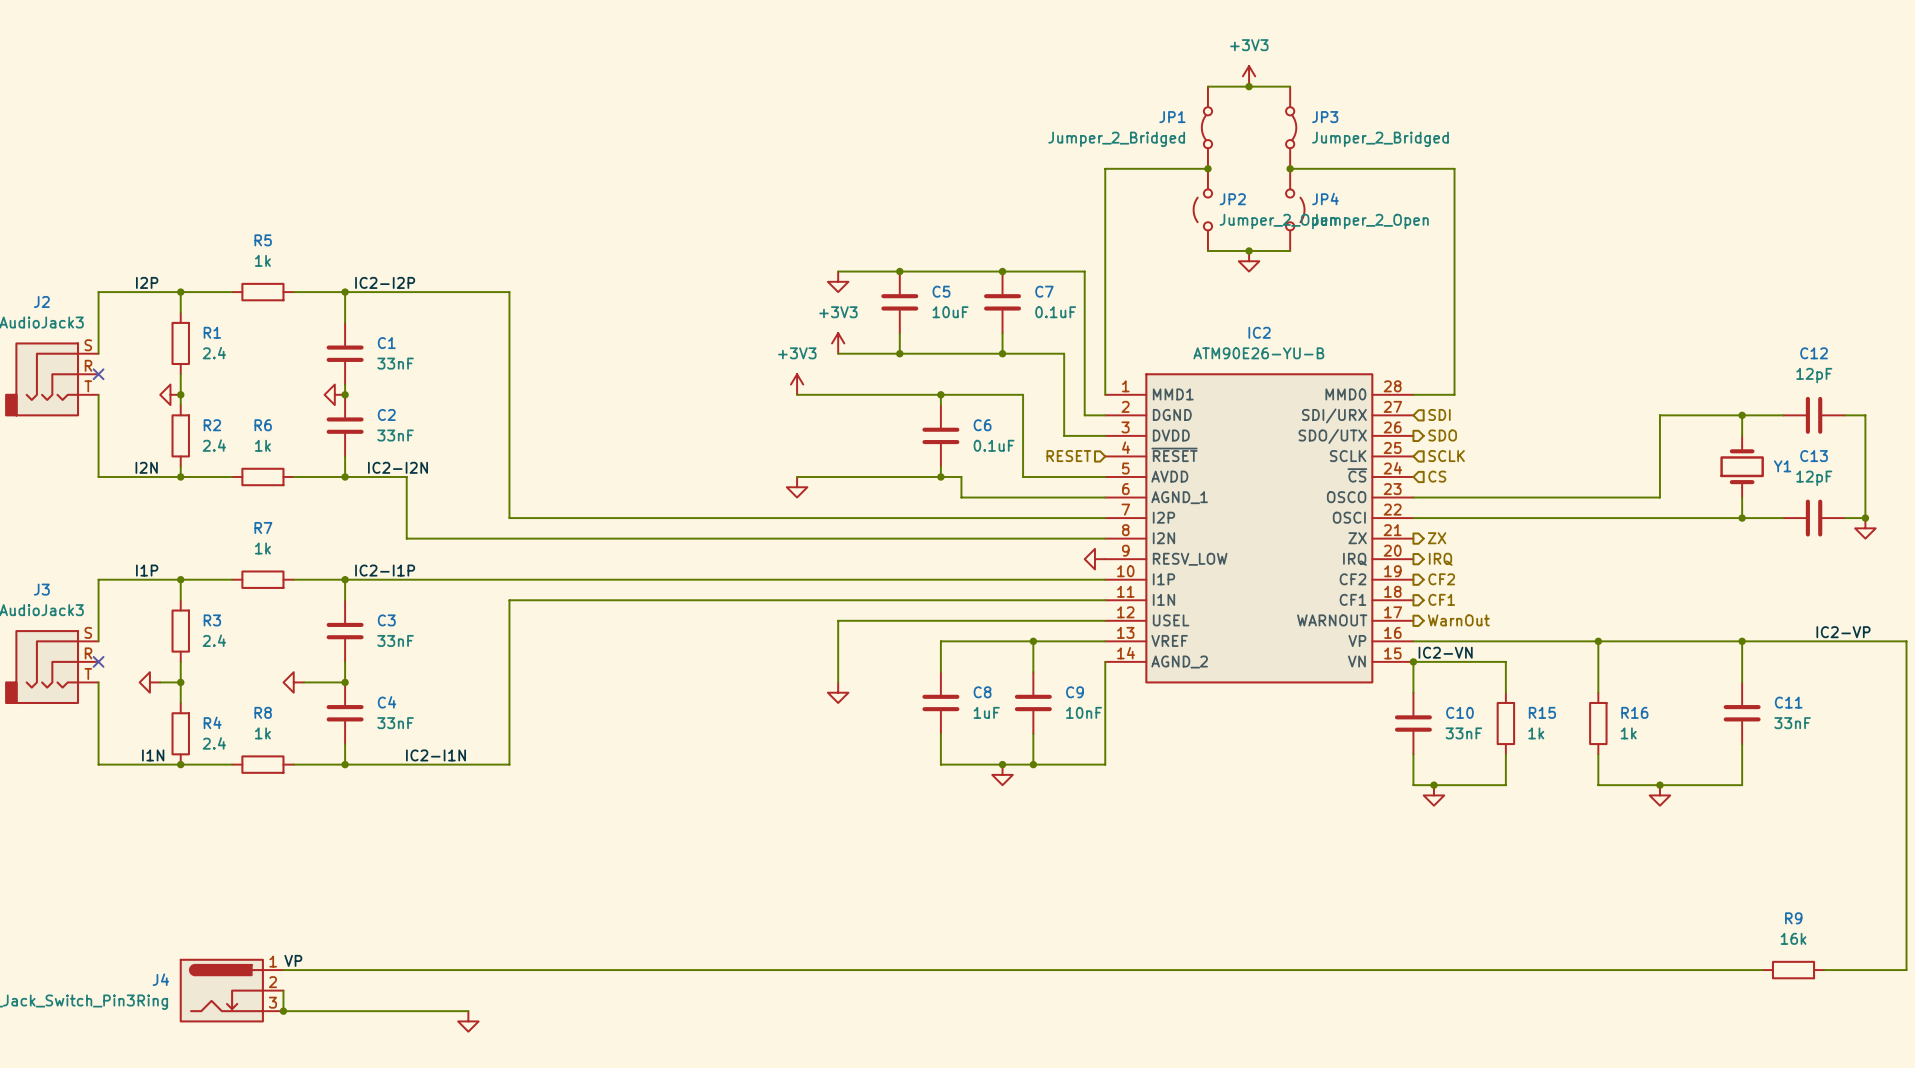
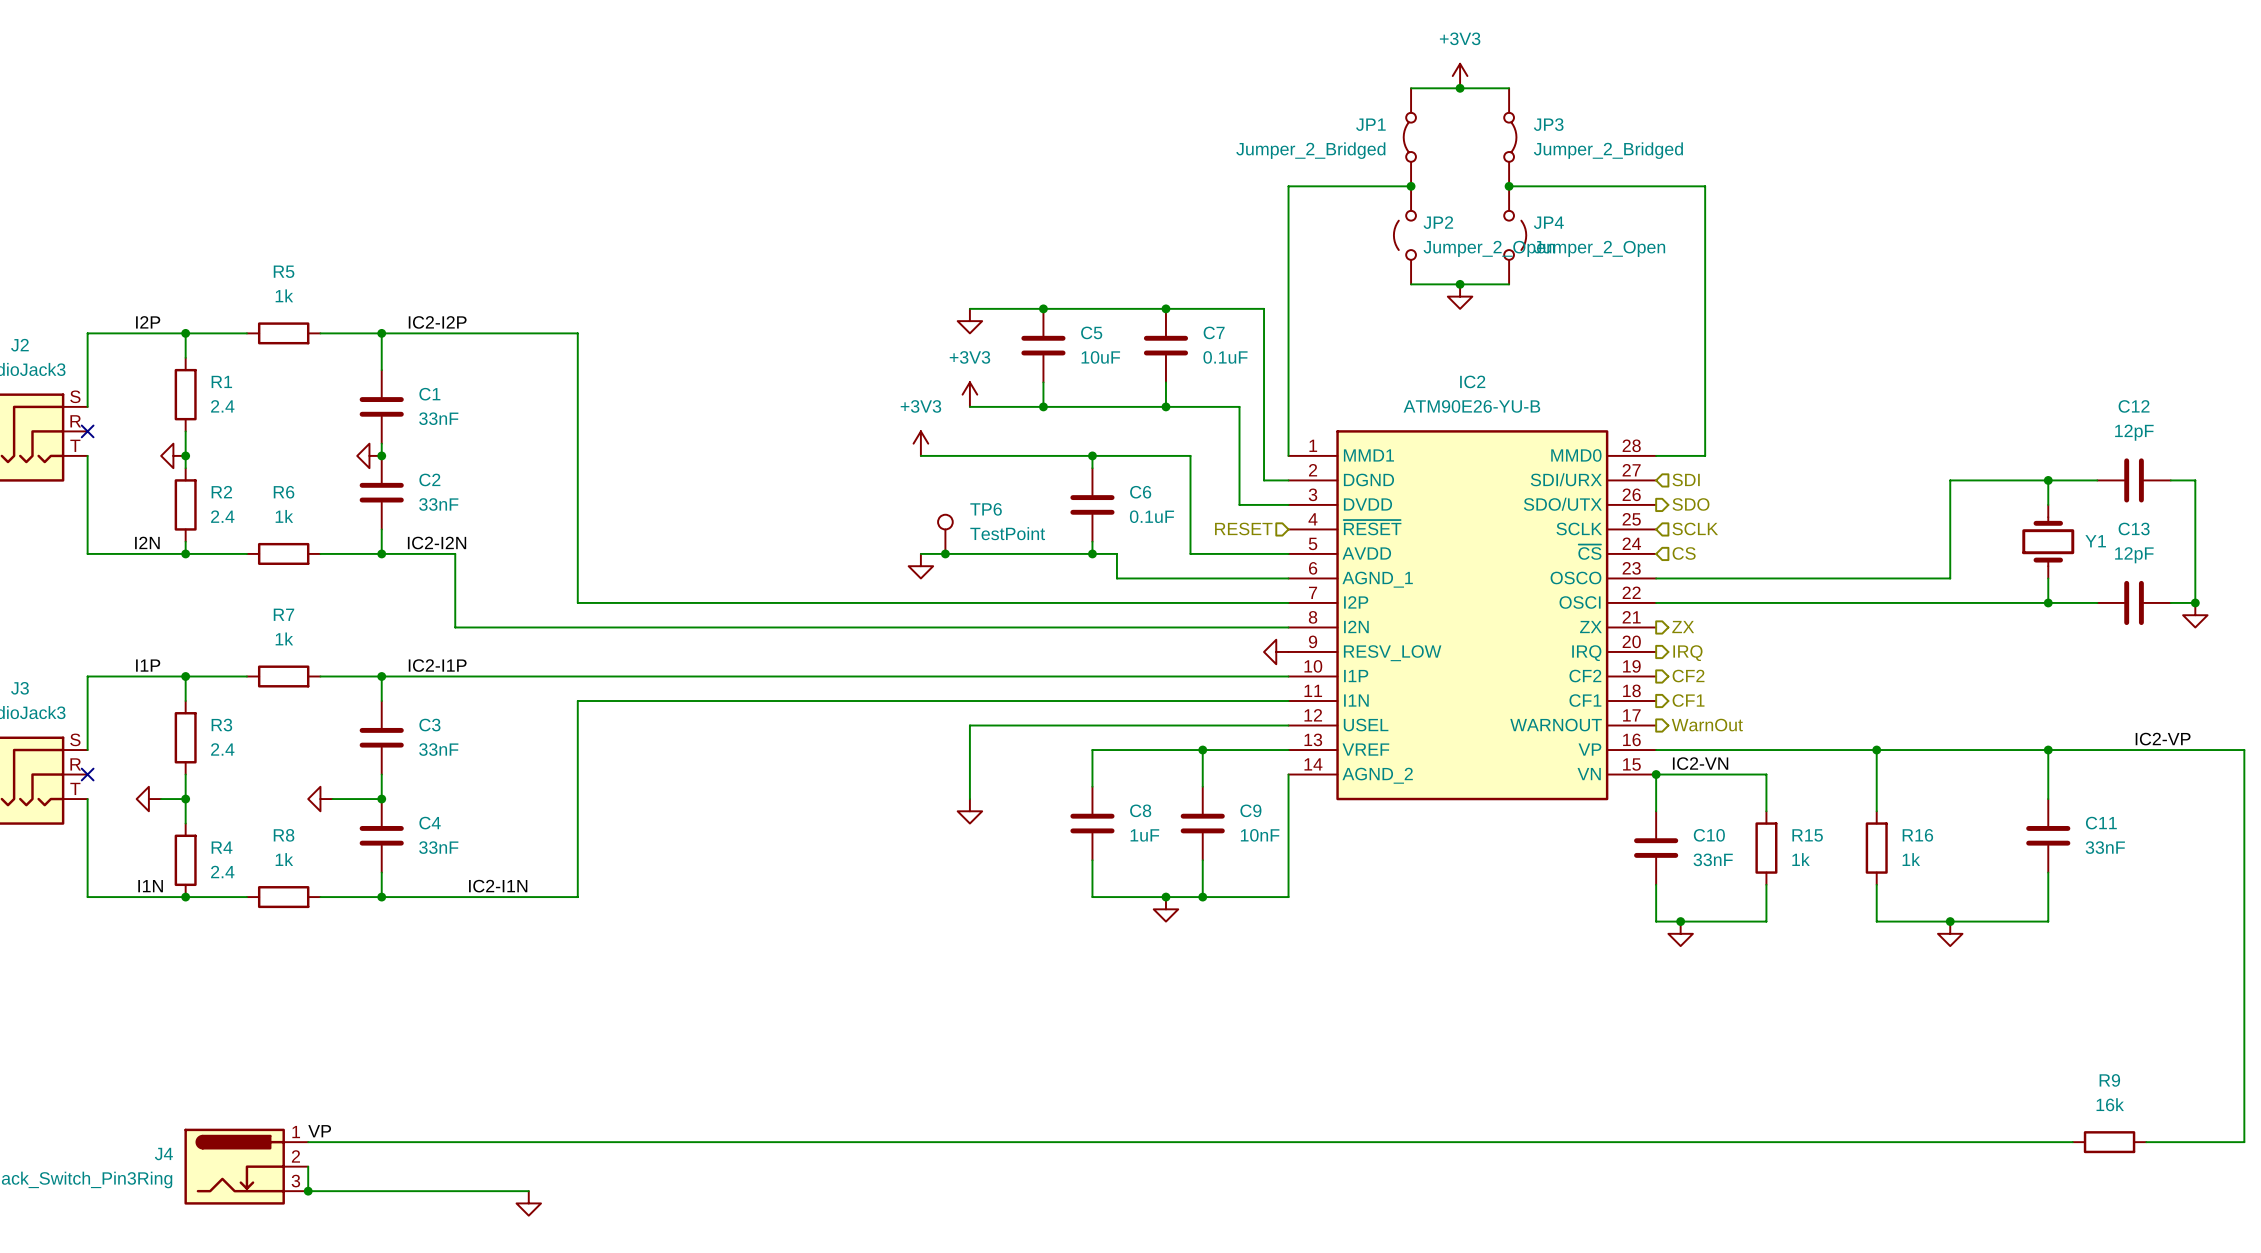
TP6: none -> TestPoint (945, 534)
junction: none -> (945, 553)

